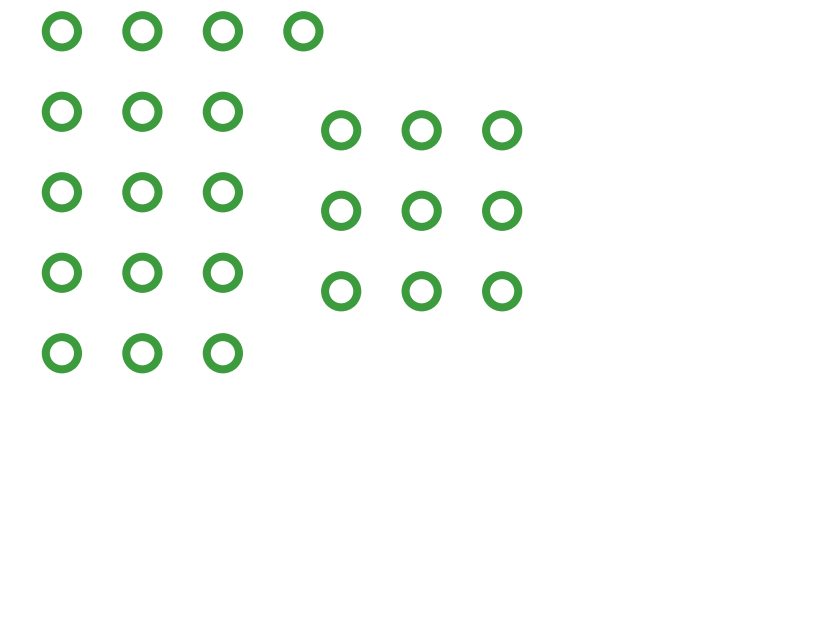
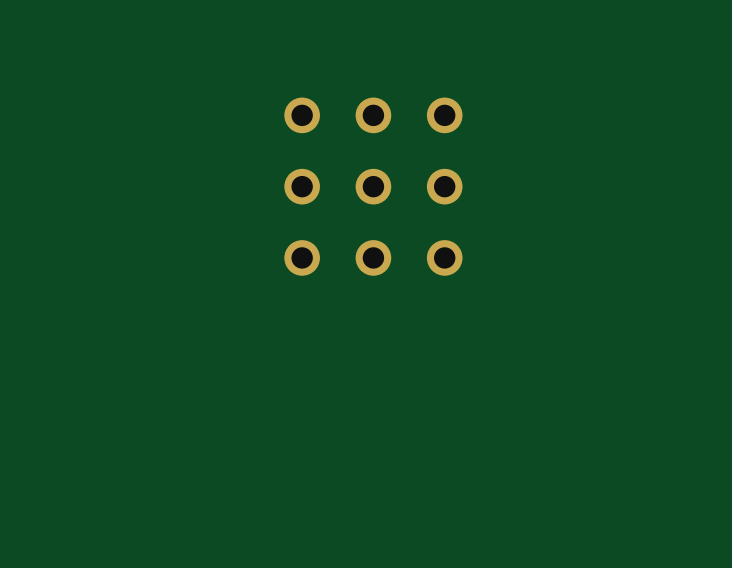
via: (61, 31) -> none
via: (142, 31) -> none
via: (222, 31) -> none
via: (303, 31) -> none
via: (61, 111) -> none
via: (142, 111) -> none
via: (222, 111) -> none
via: (61, 192) -> none
via: (142, 192) -> none
via: (222, 192) -> none
via: (61, 272) -> none
via: (142, 272) -> none
via: (222, 272) -> none
via: (61, 353) -> none
via: (142, 353) -> none
via: (222, 353) -> none

